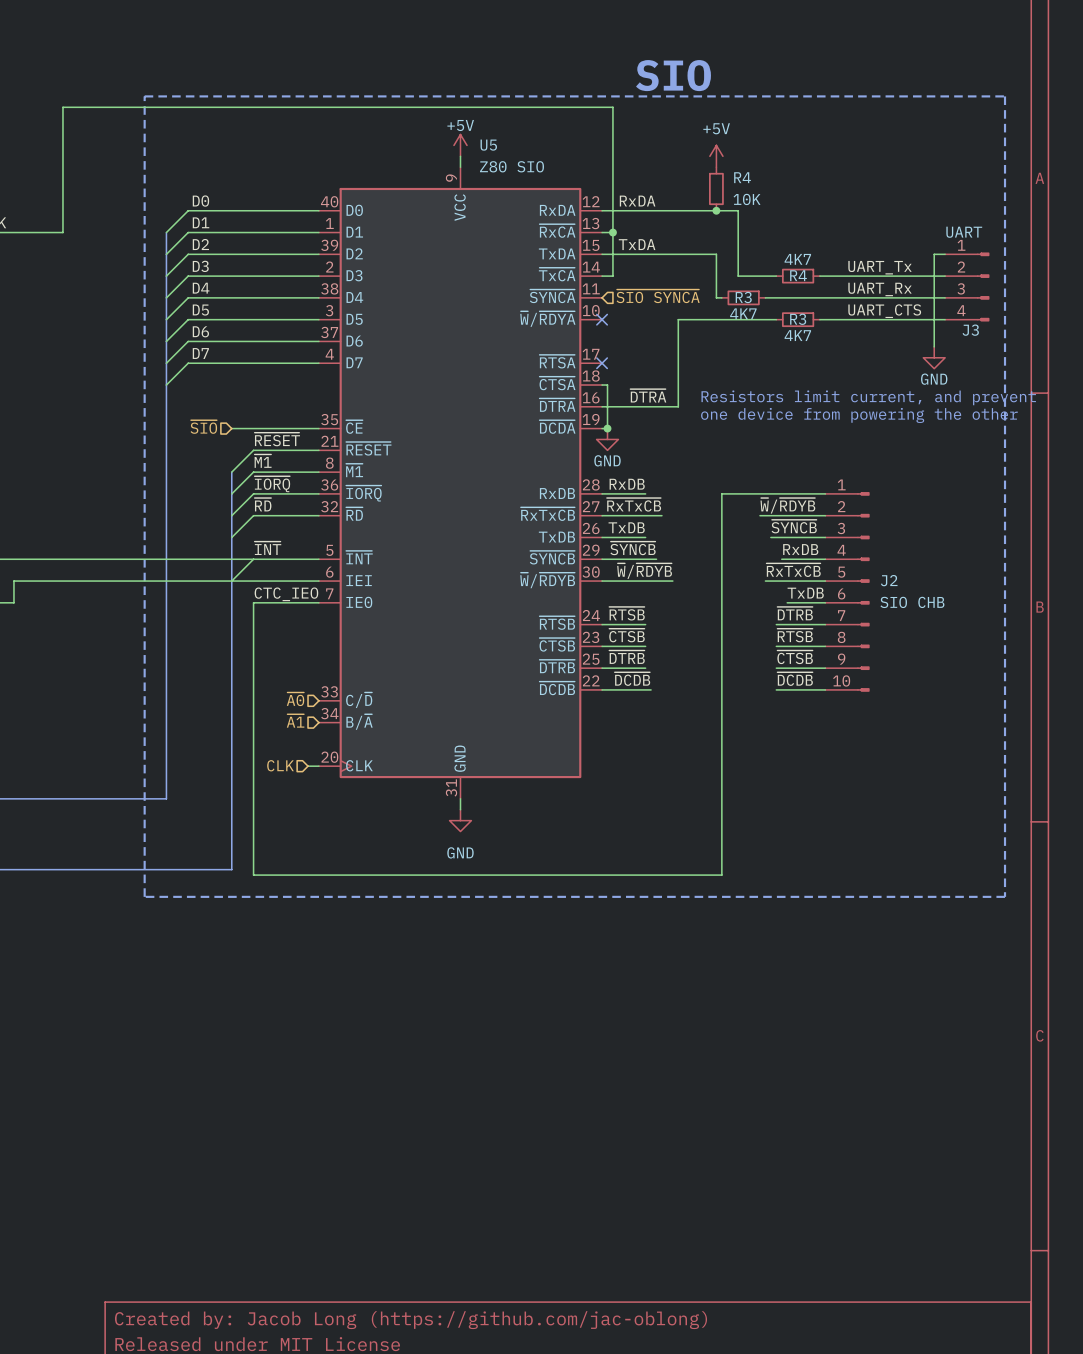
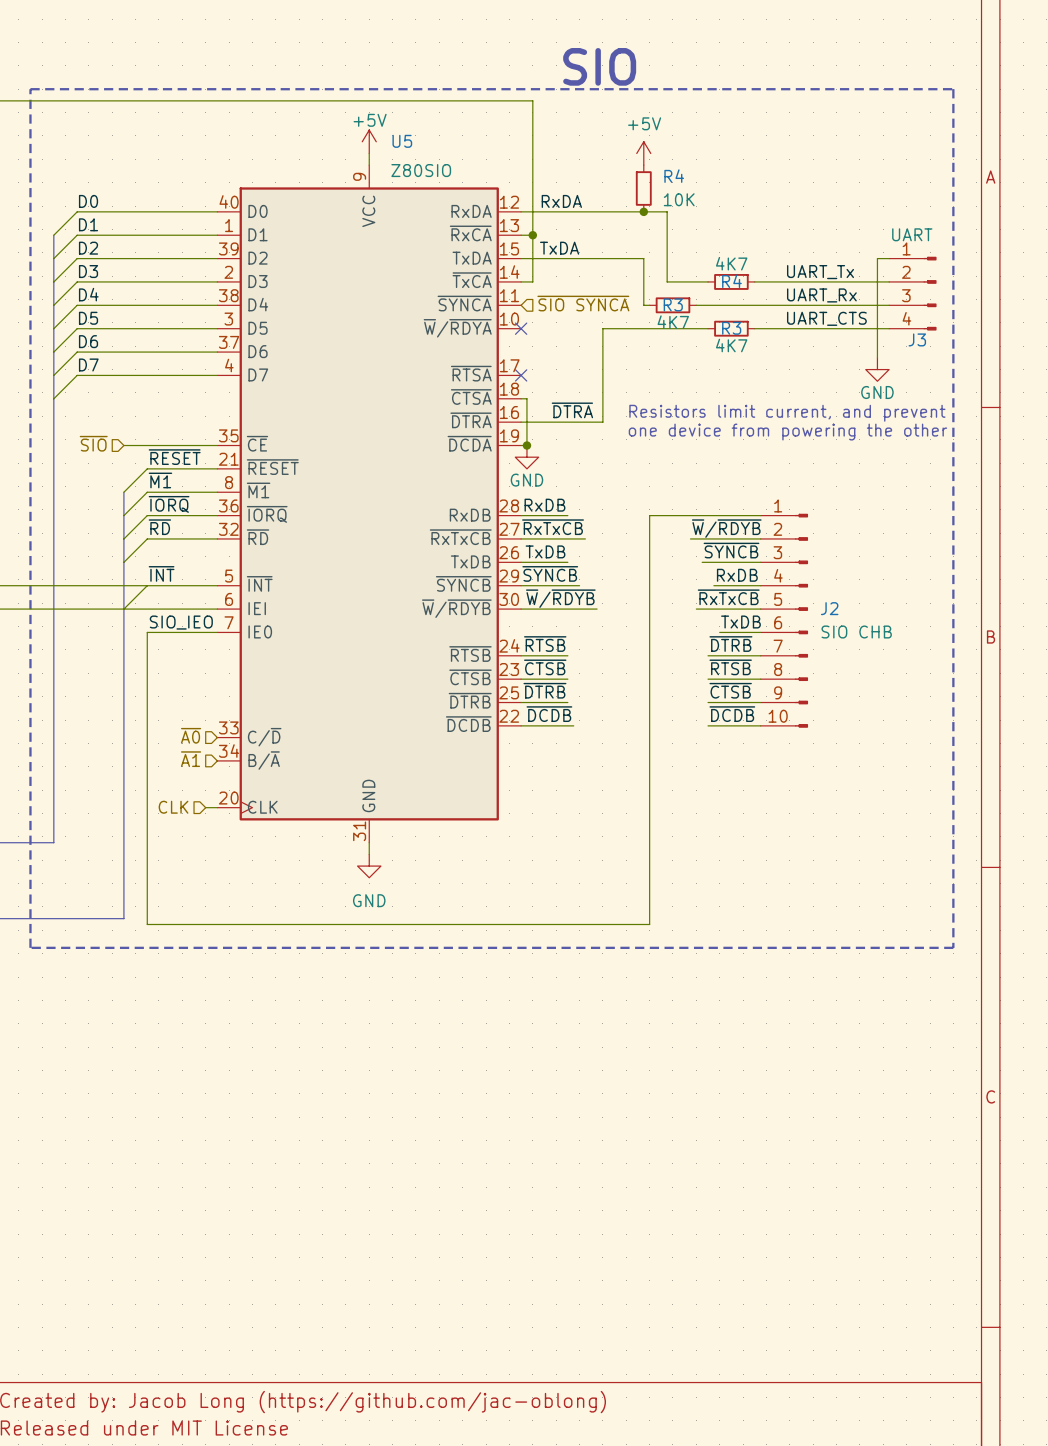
U5 value: Z80 SIO (512, 166) -> Z80SIO (421, 170)
label: CTC_IEO (286, 594) -> SIO_IEO (181, 622)

